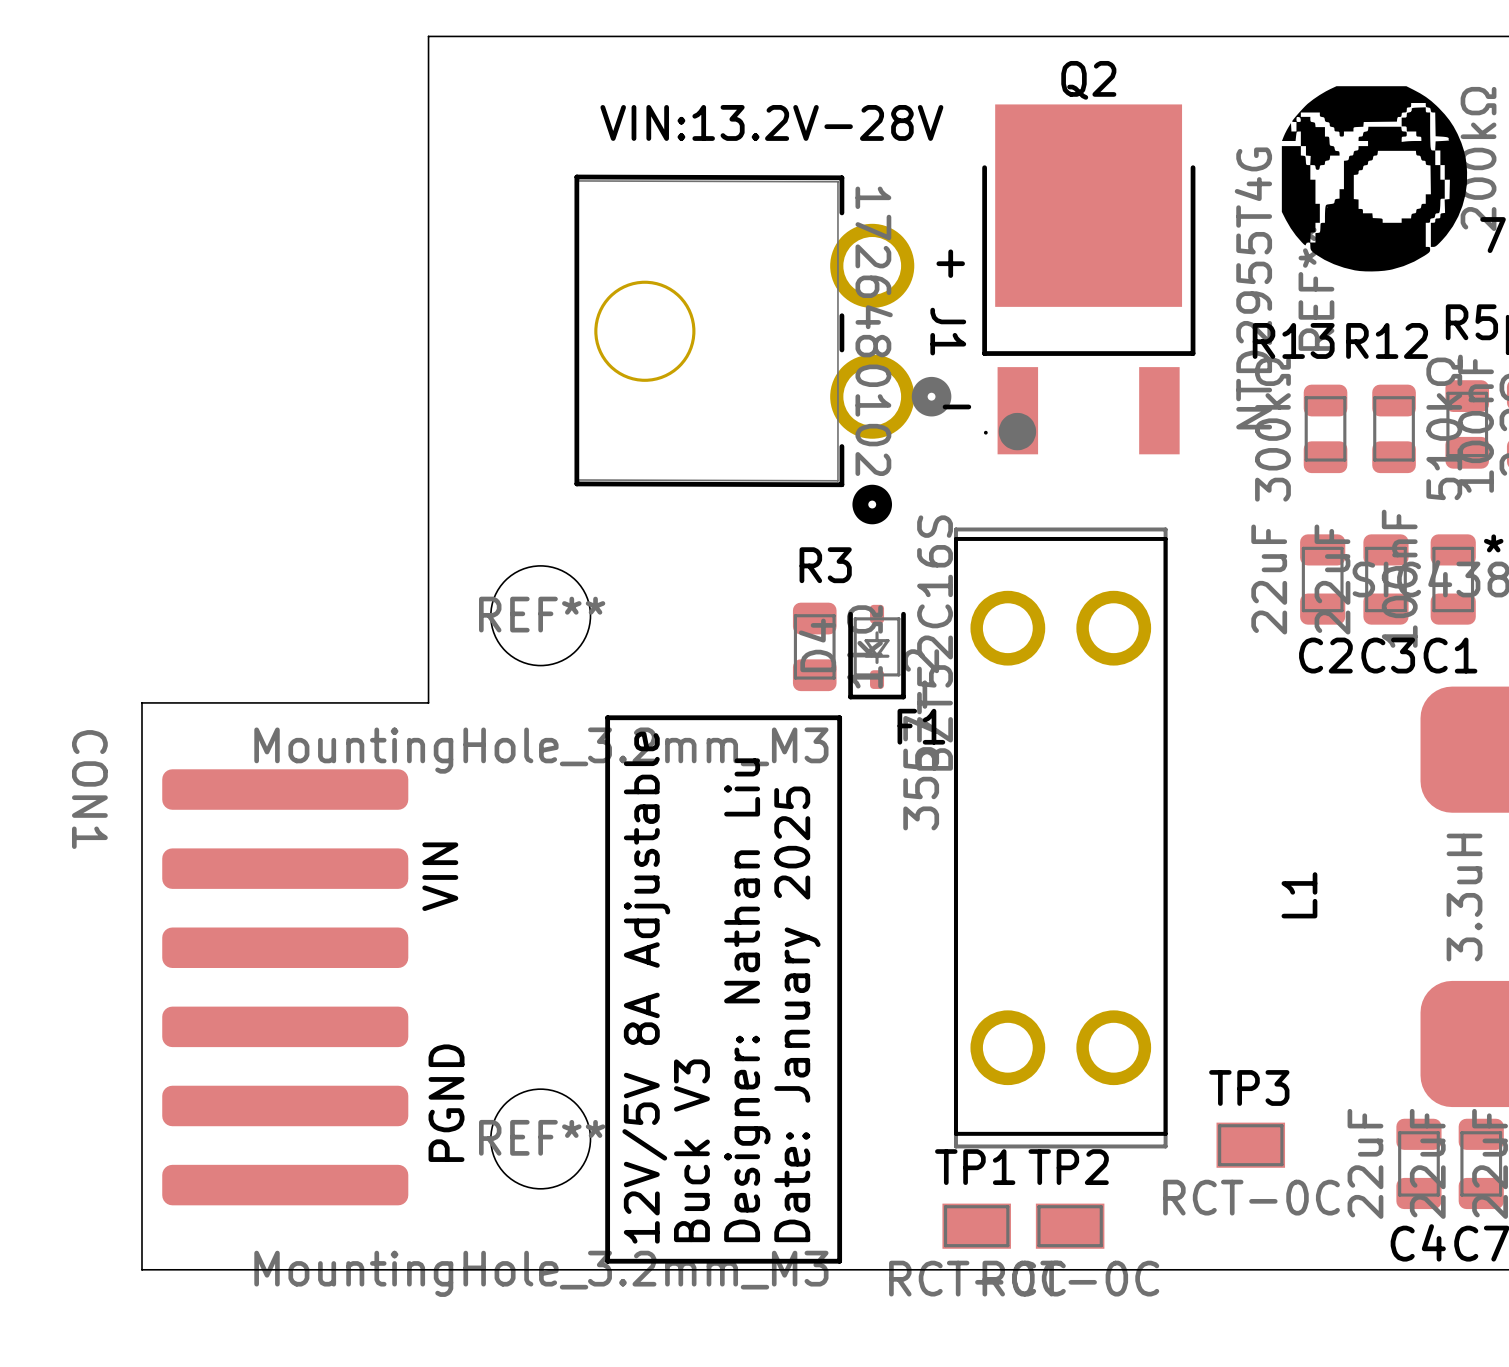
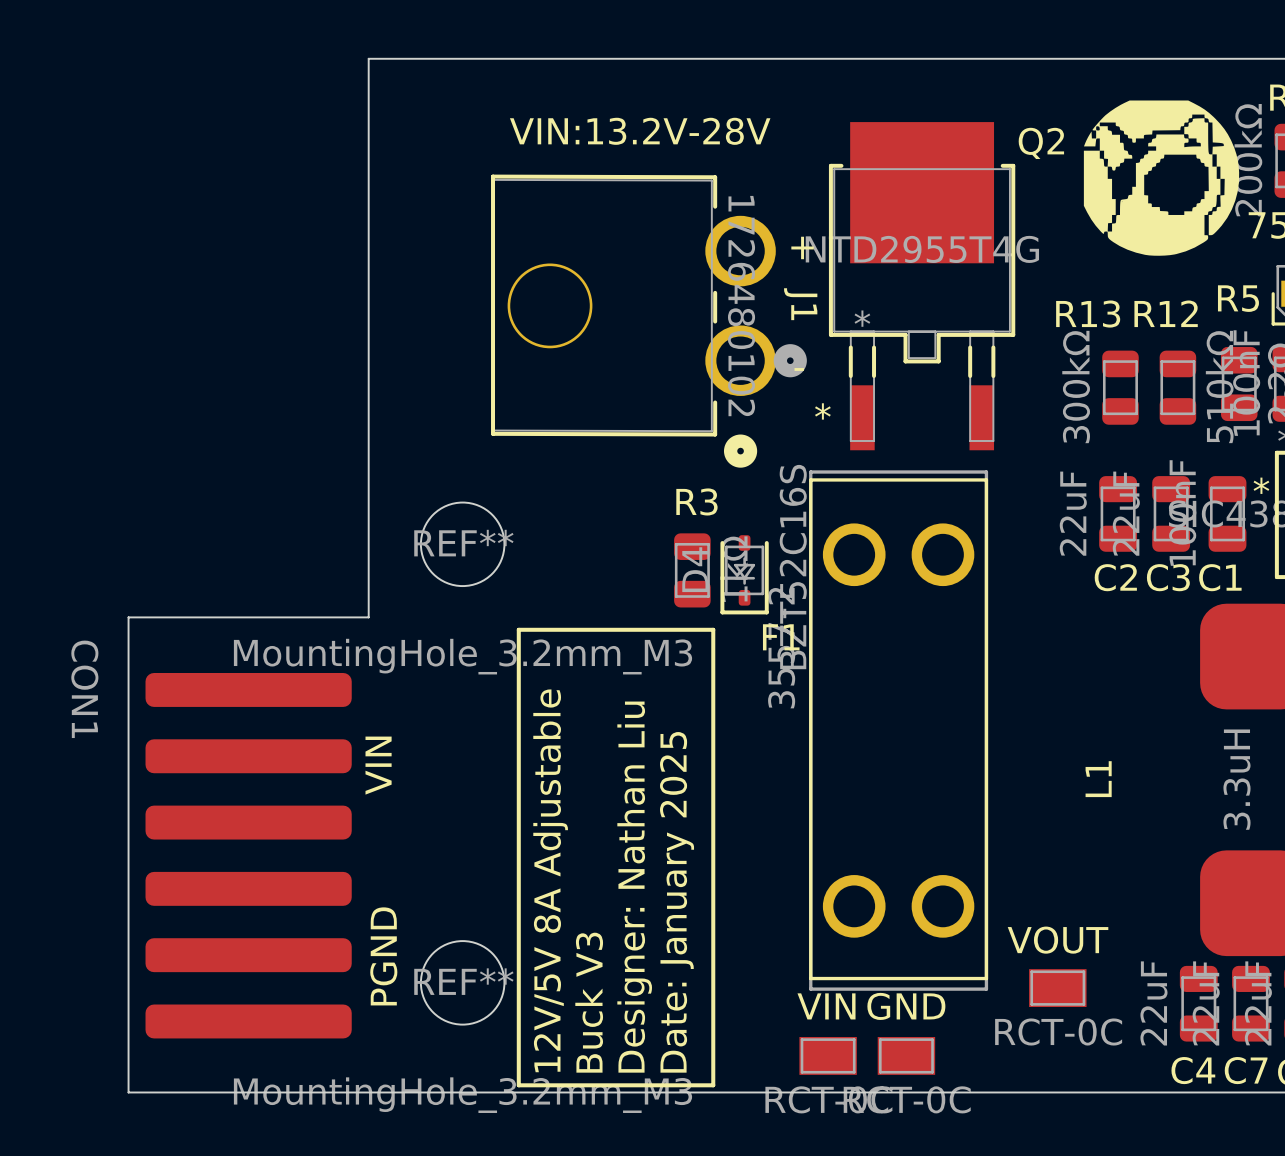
Q2 name position: Q2 (1088, 80) -> Q2 (1041, 143)
Q2 footprint: [982, 104, 1196, 455] -> [828, 122, 1016, 451]
Q2 value position: NTD2955T4G (1253, 288) -> NTD2955T4G (922, 249)
TP3 name: TP3 (1249, 1087) -> VOUT (1058, 940)
TP1 name: TP1 (975, 1167) -> VIN (826, 1006)
TP2 name: TP2 (1068, 1167) -> GND (906, 1006)

